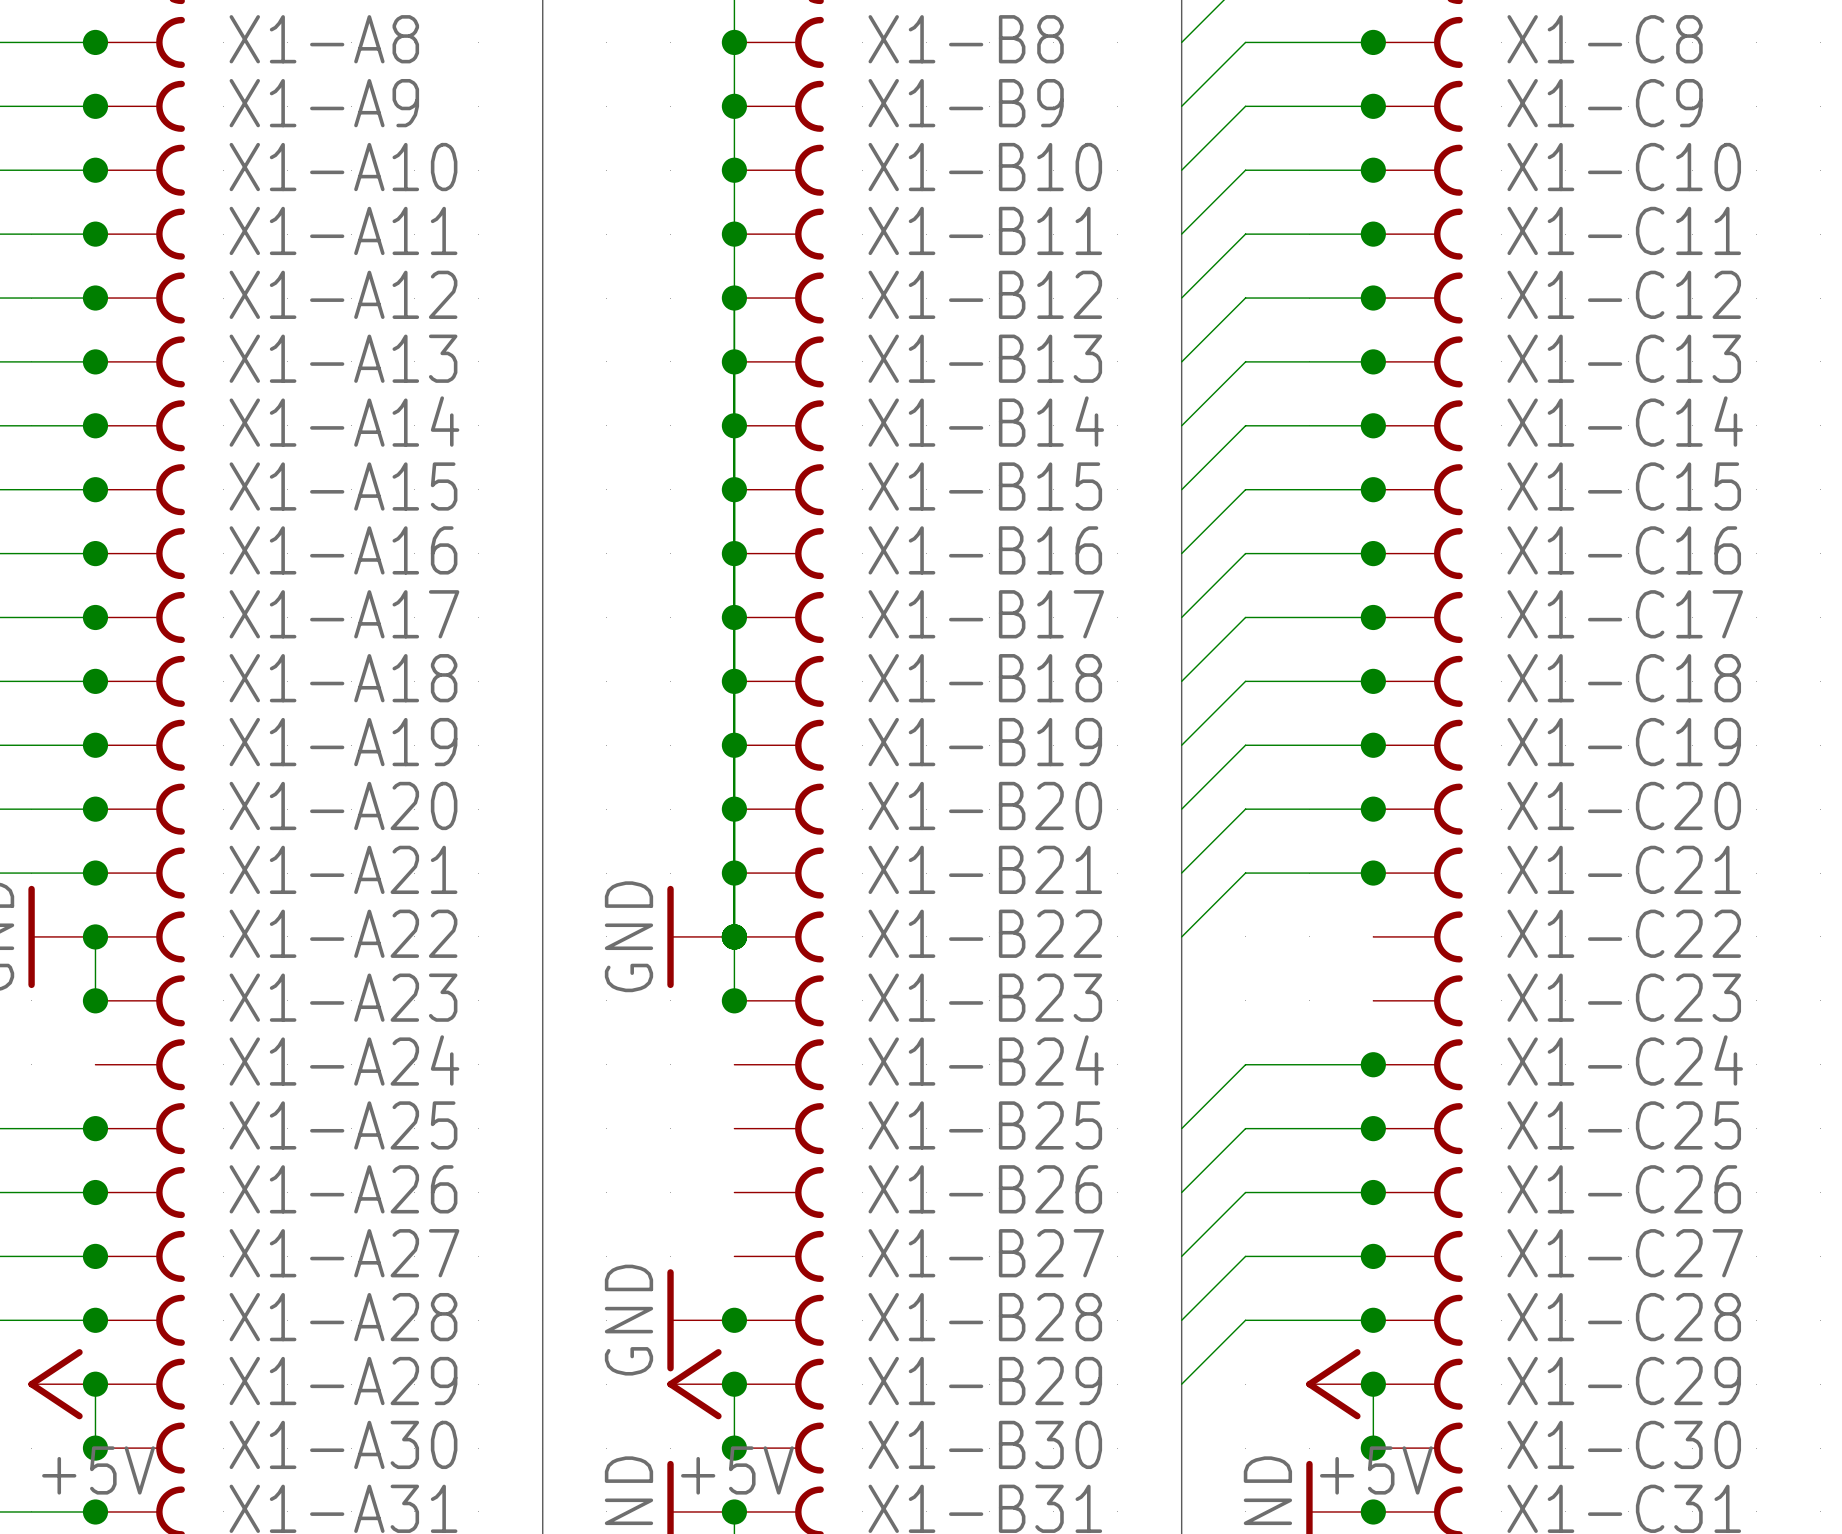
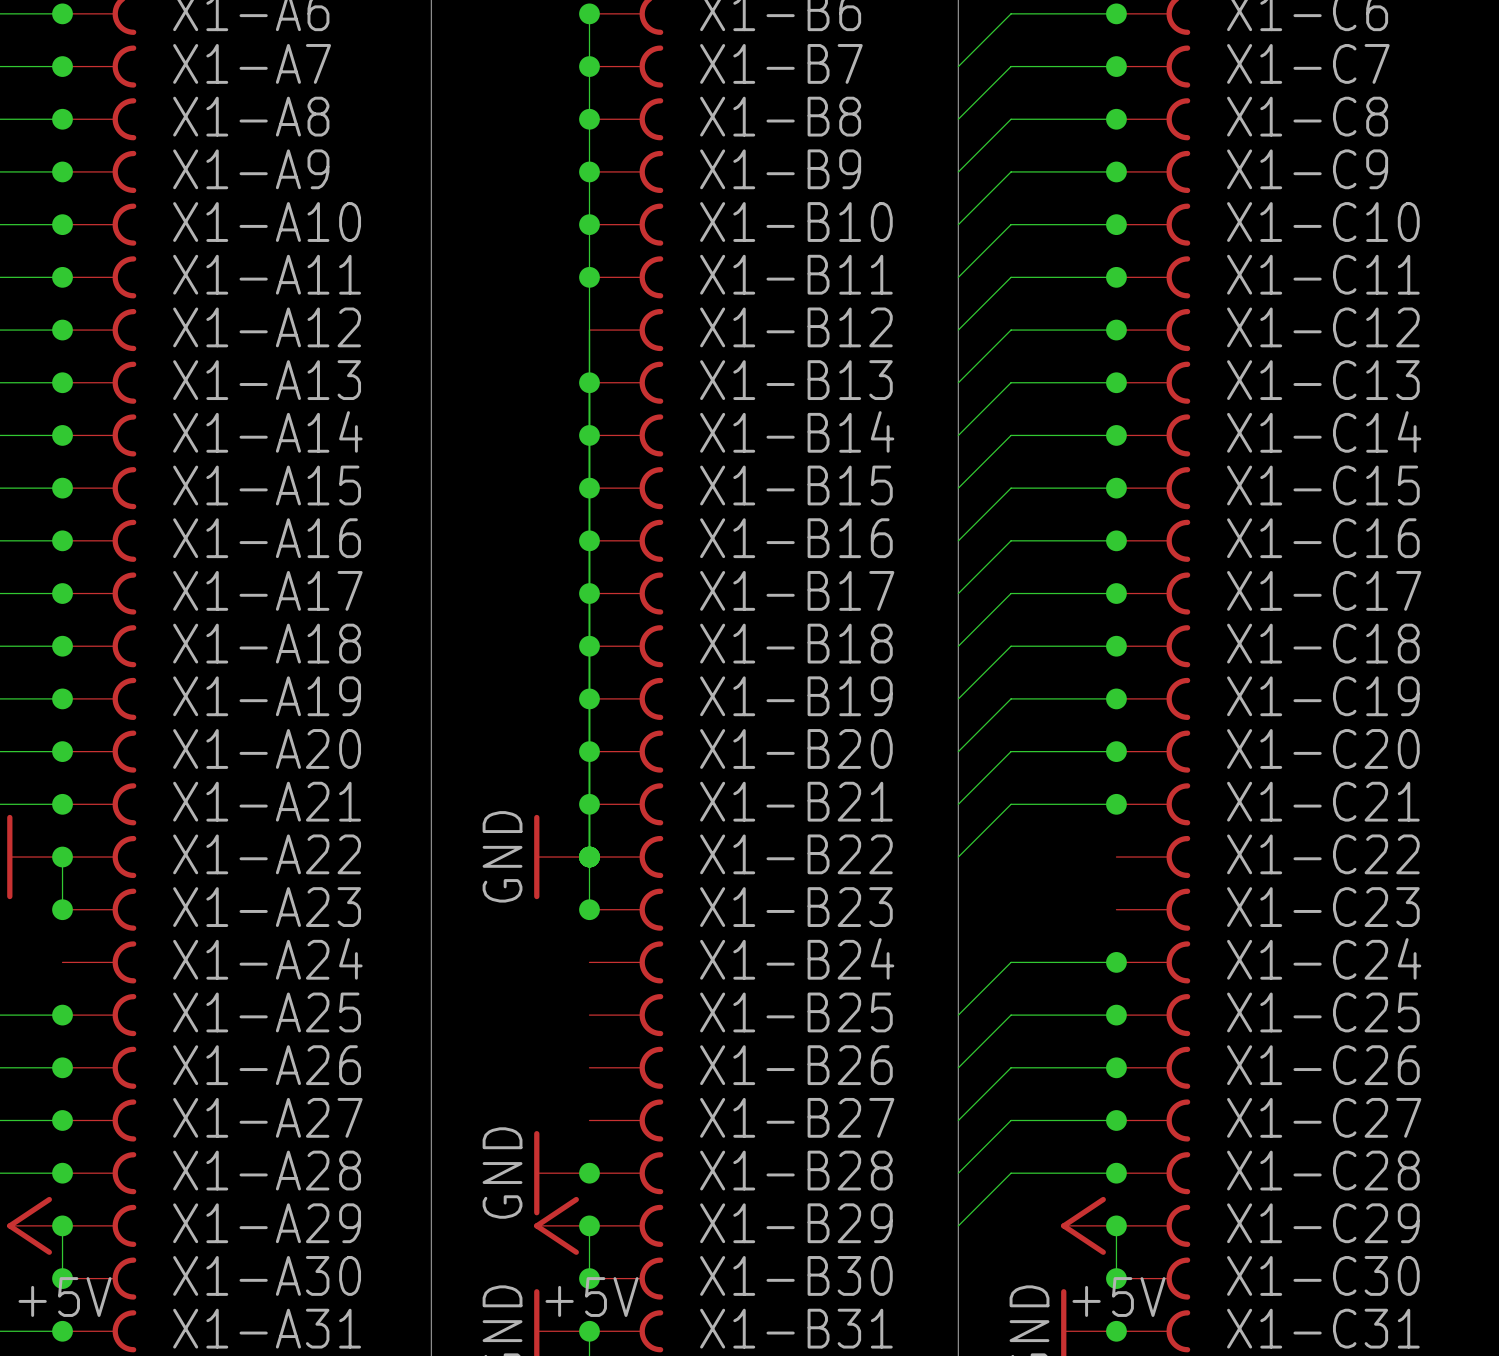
junction: (734, 298) -> none

